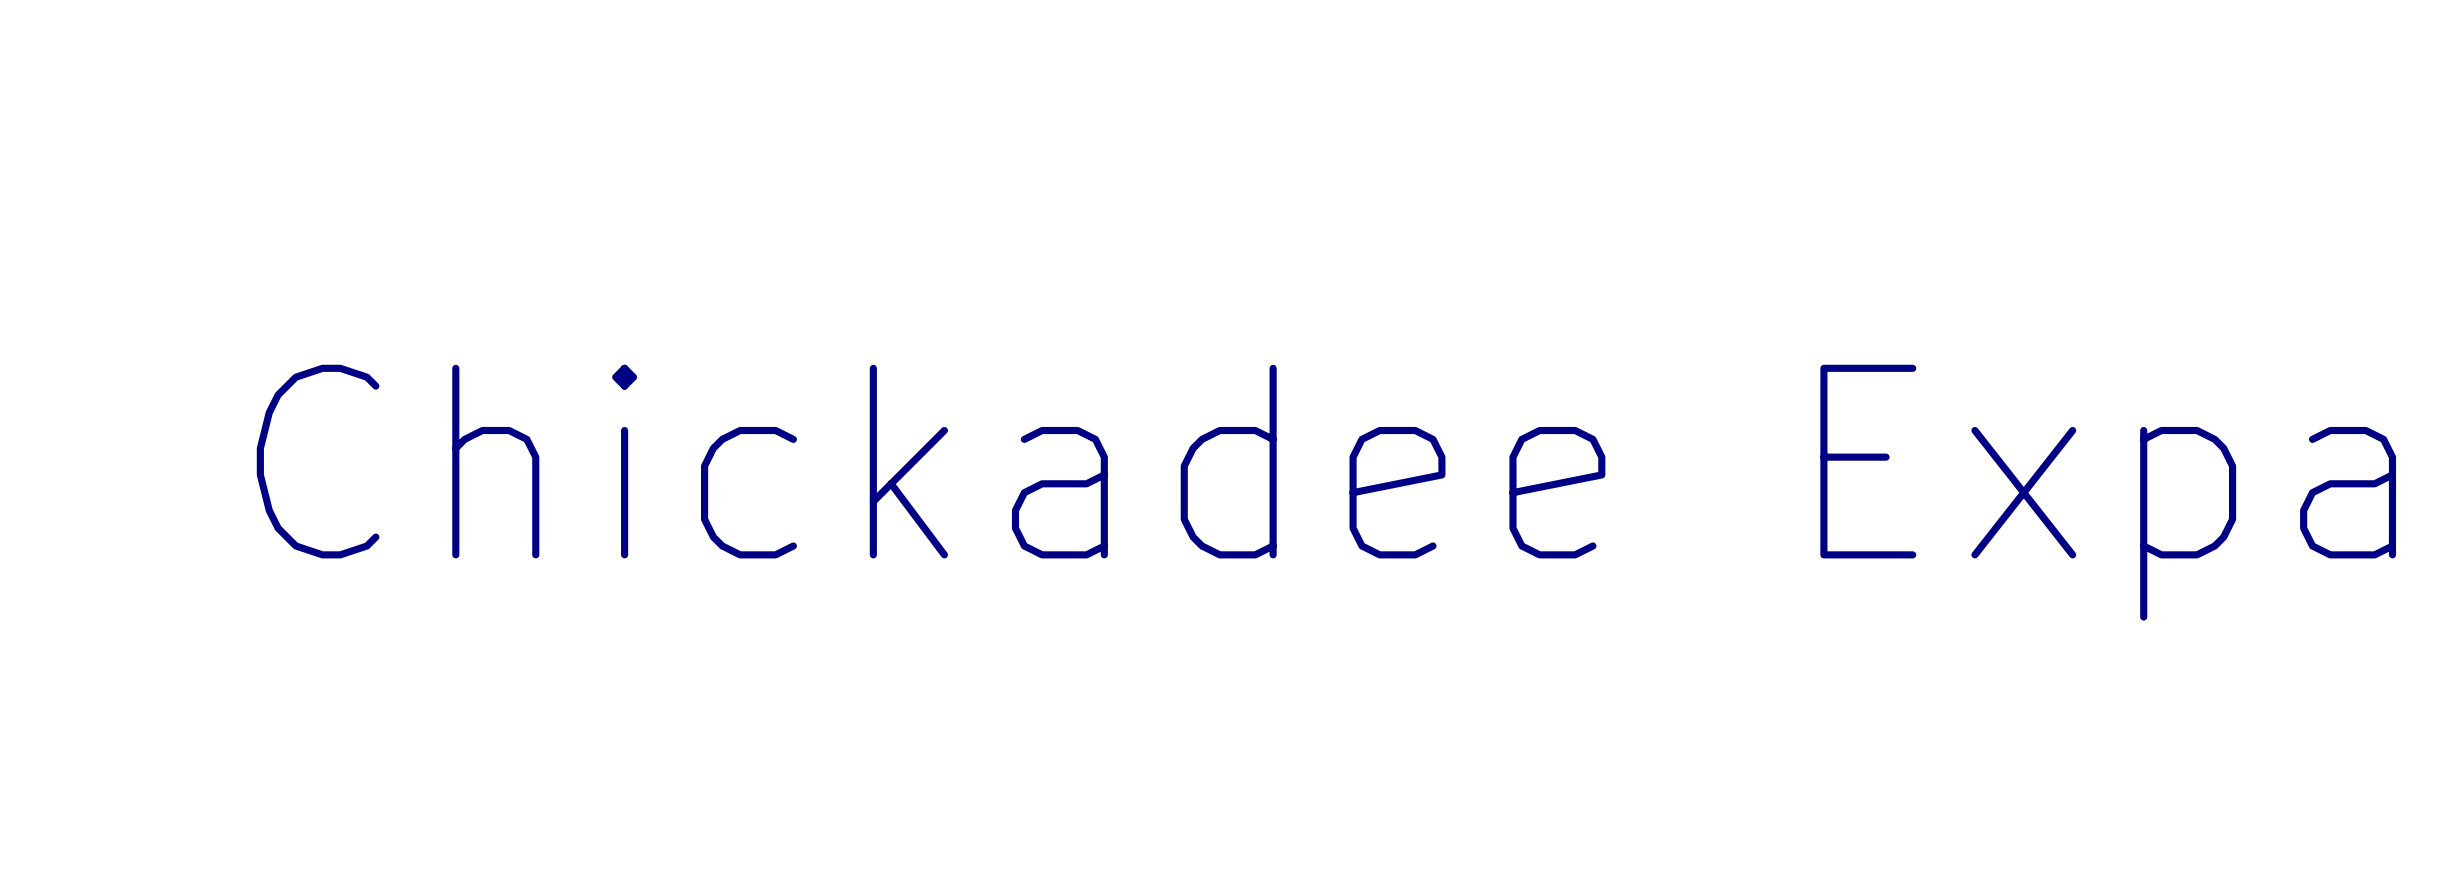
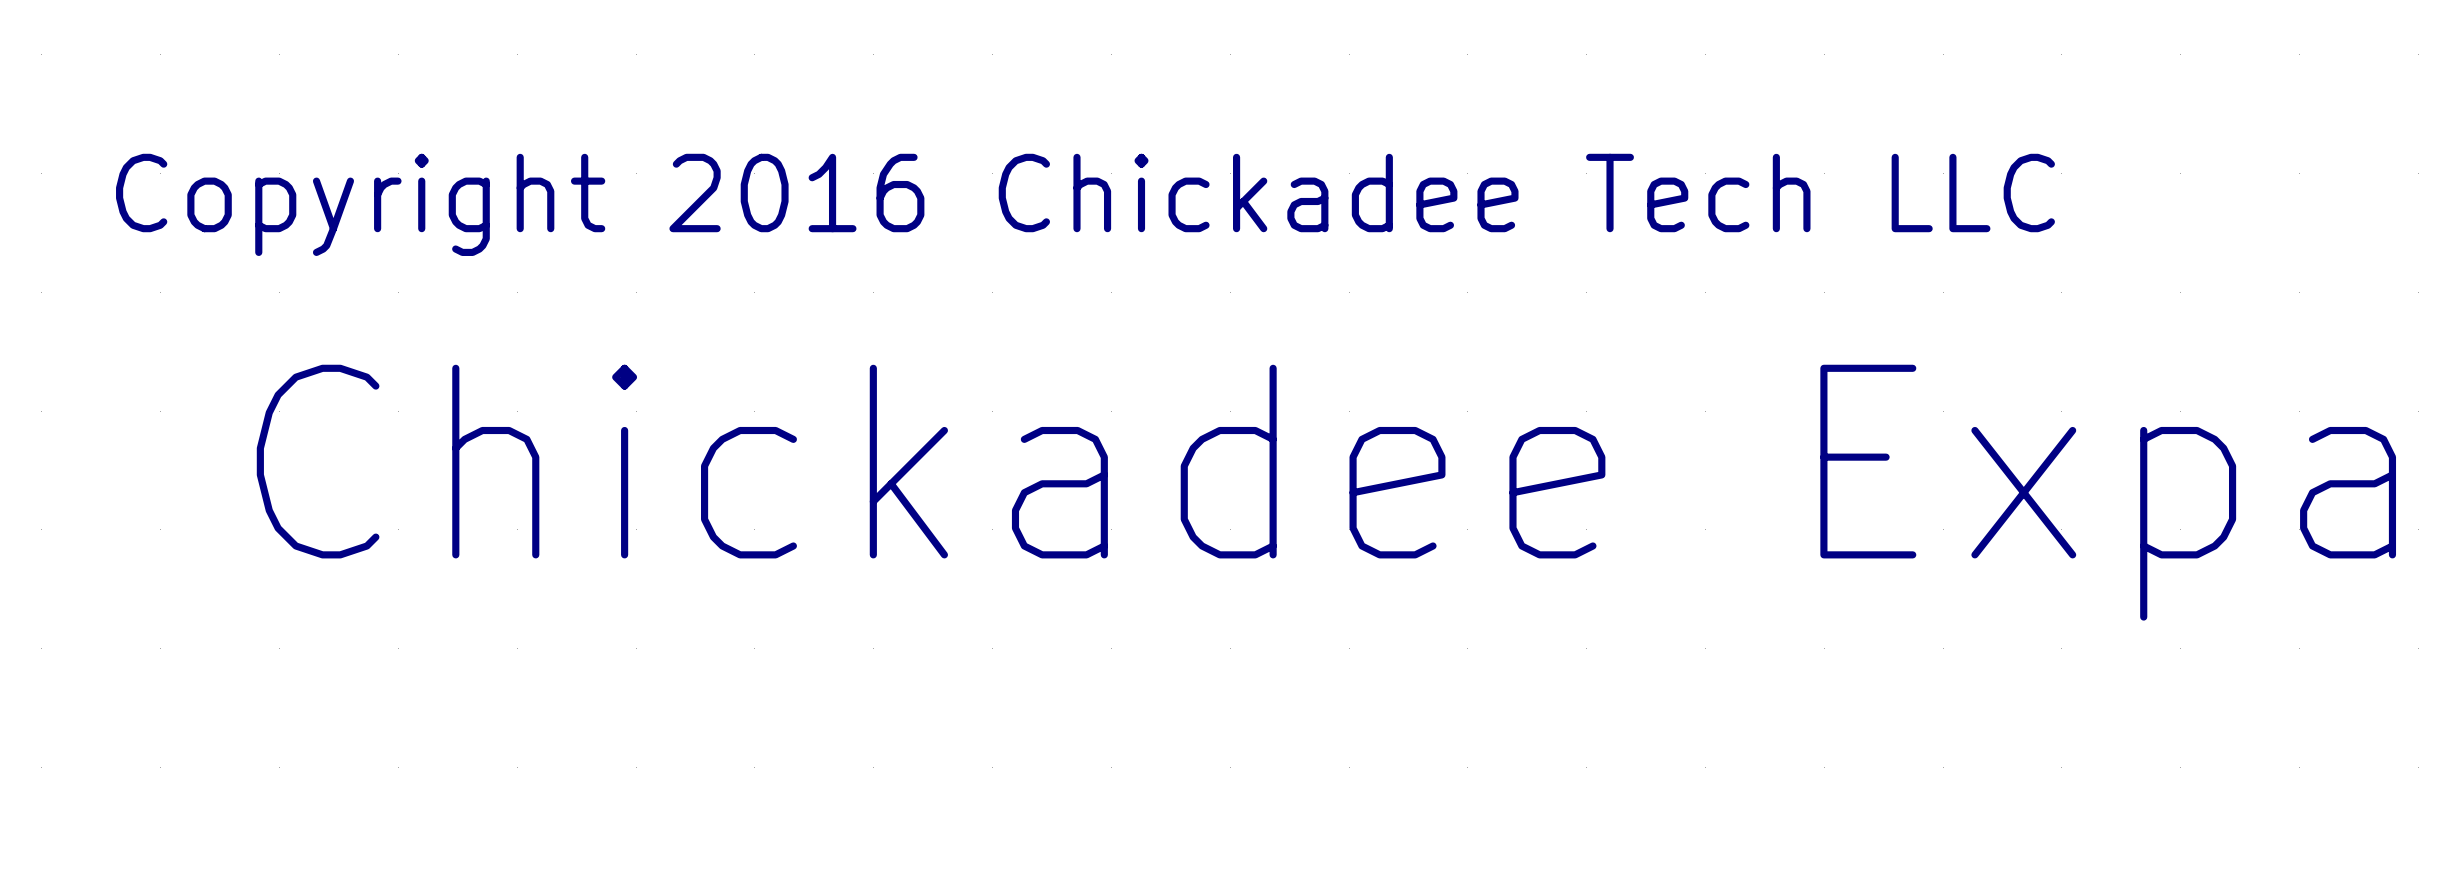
text: none -> Copyright 2016 Chickadee Tech LLC (1085, 204)

